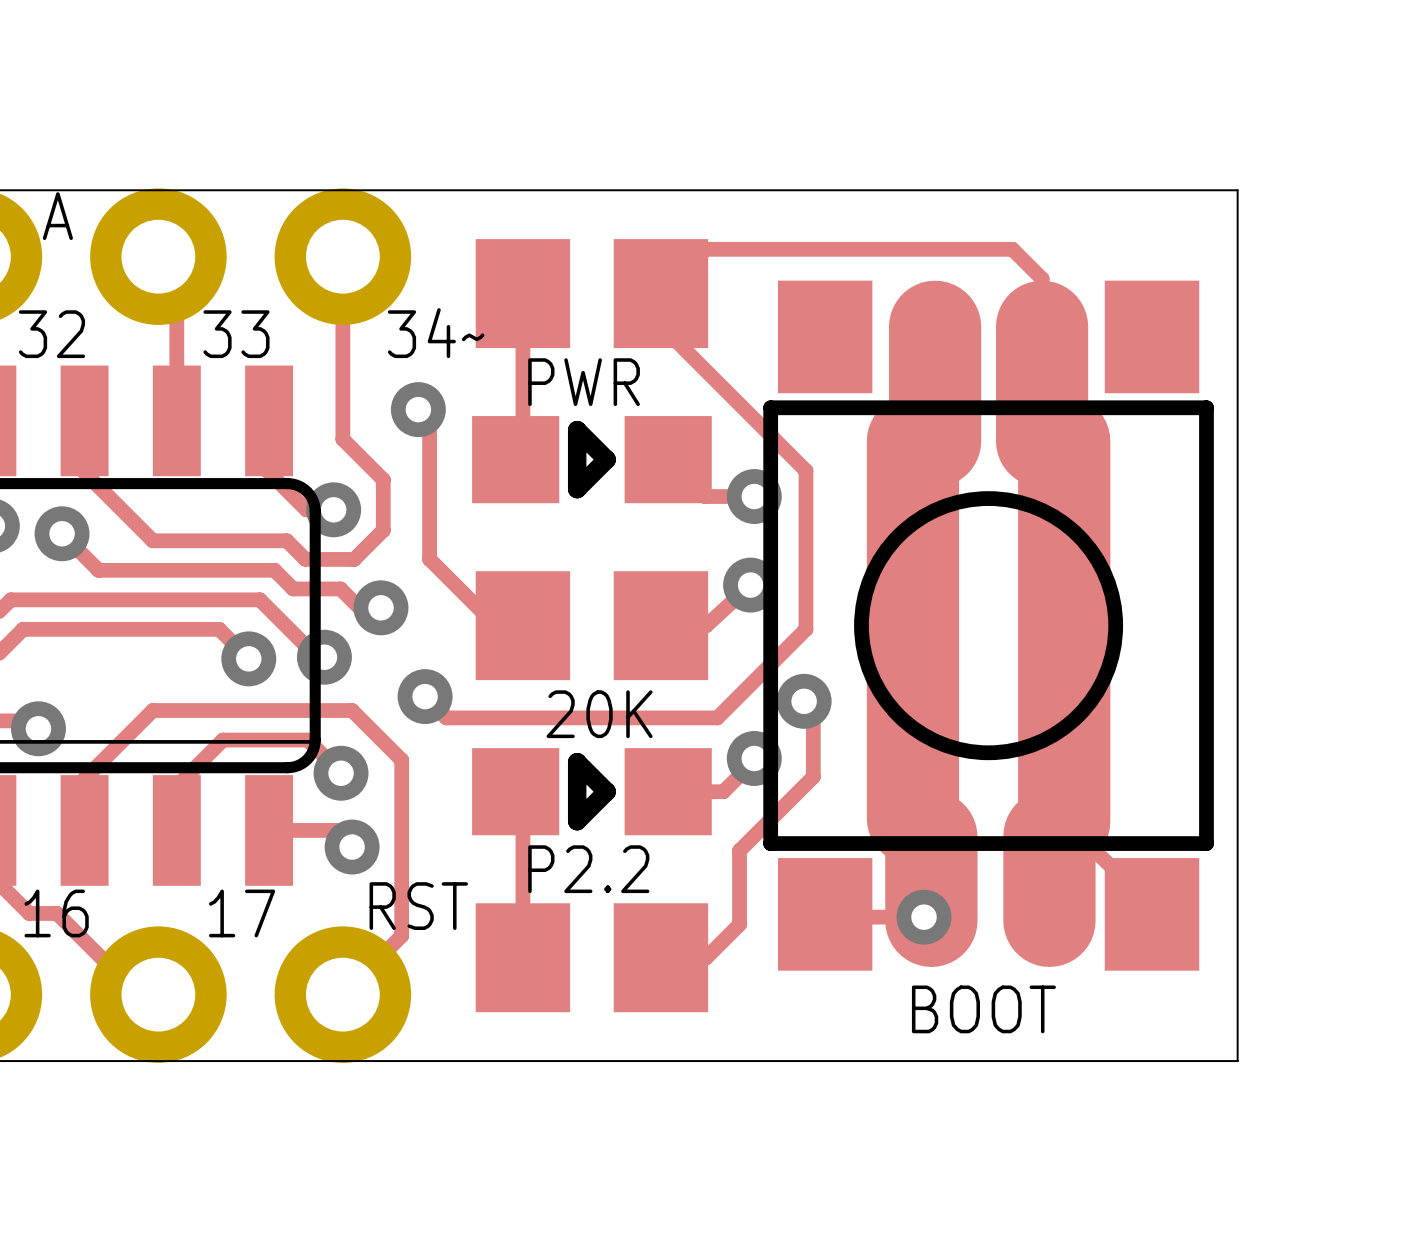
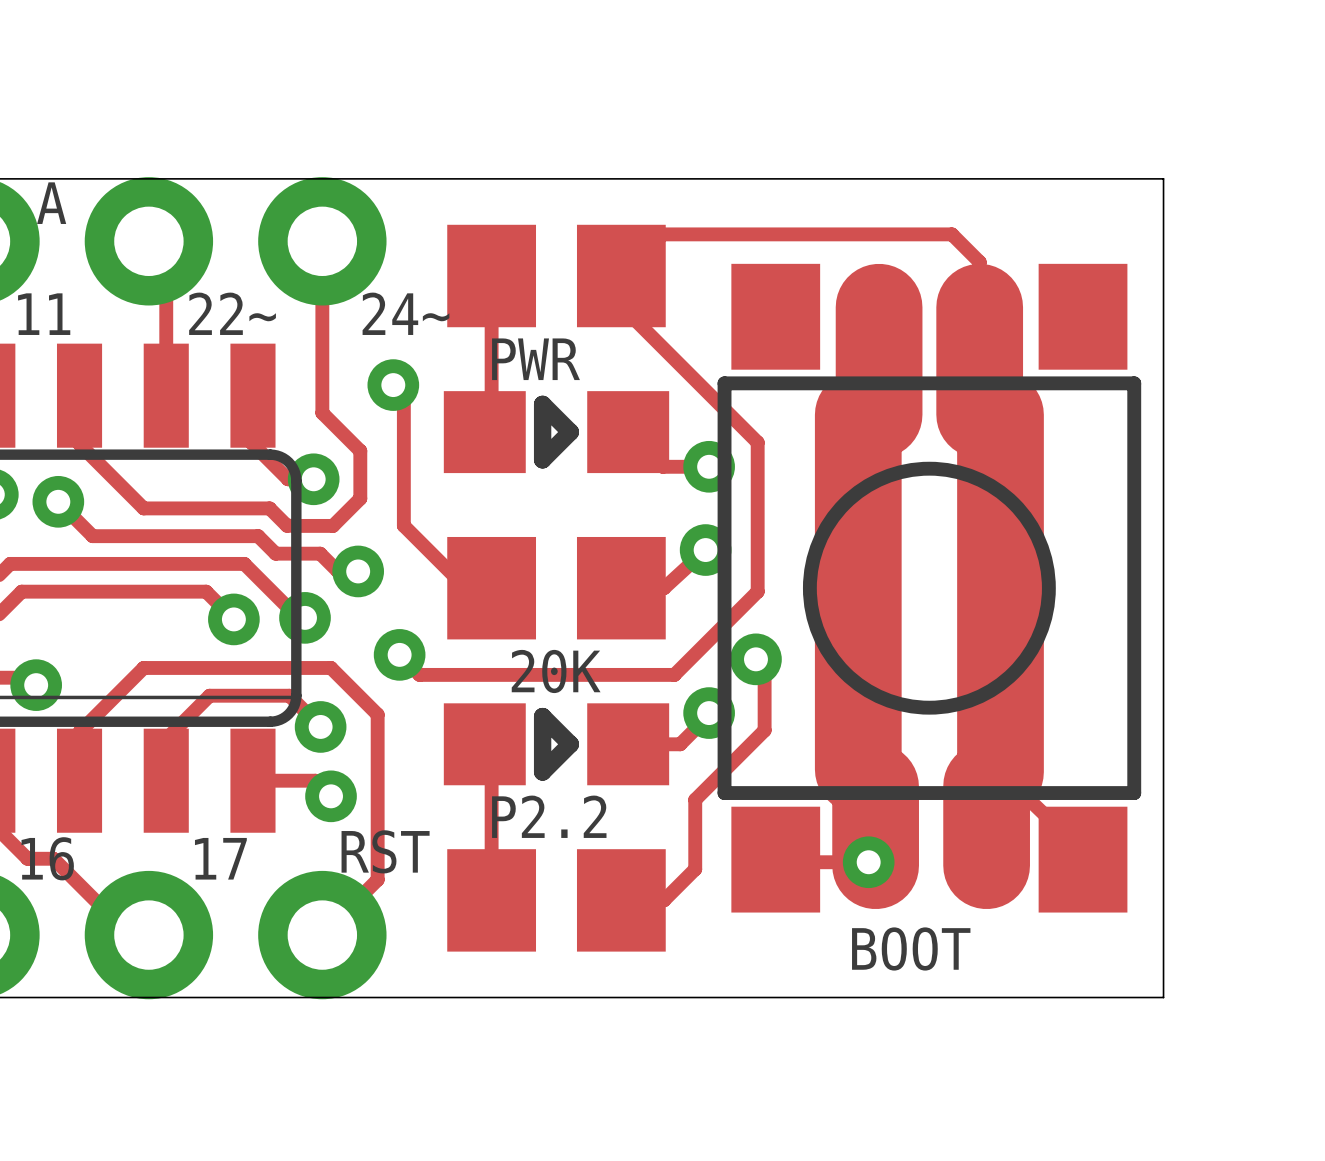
text: 34~ (436, 333) -> 24~ (405, 313)
text: 32 (51, 334) -> 11 (44, 314)
text: 33 (236, 334) -> 22~ (232, 313)

